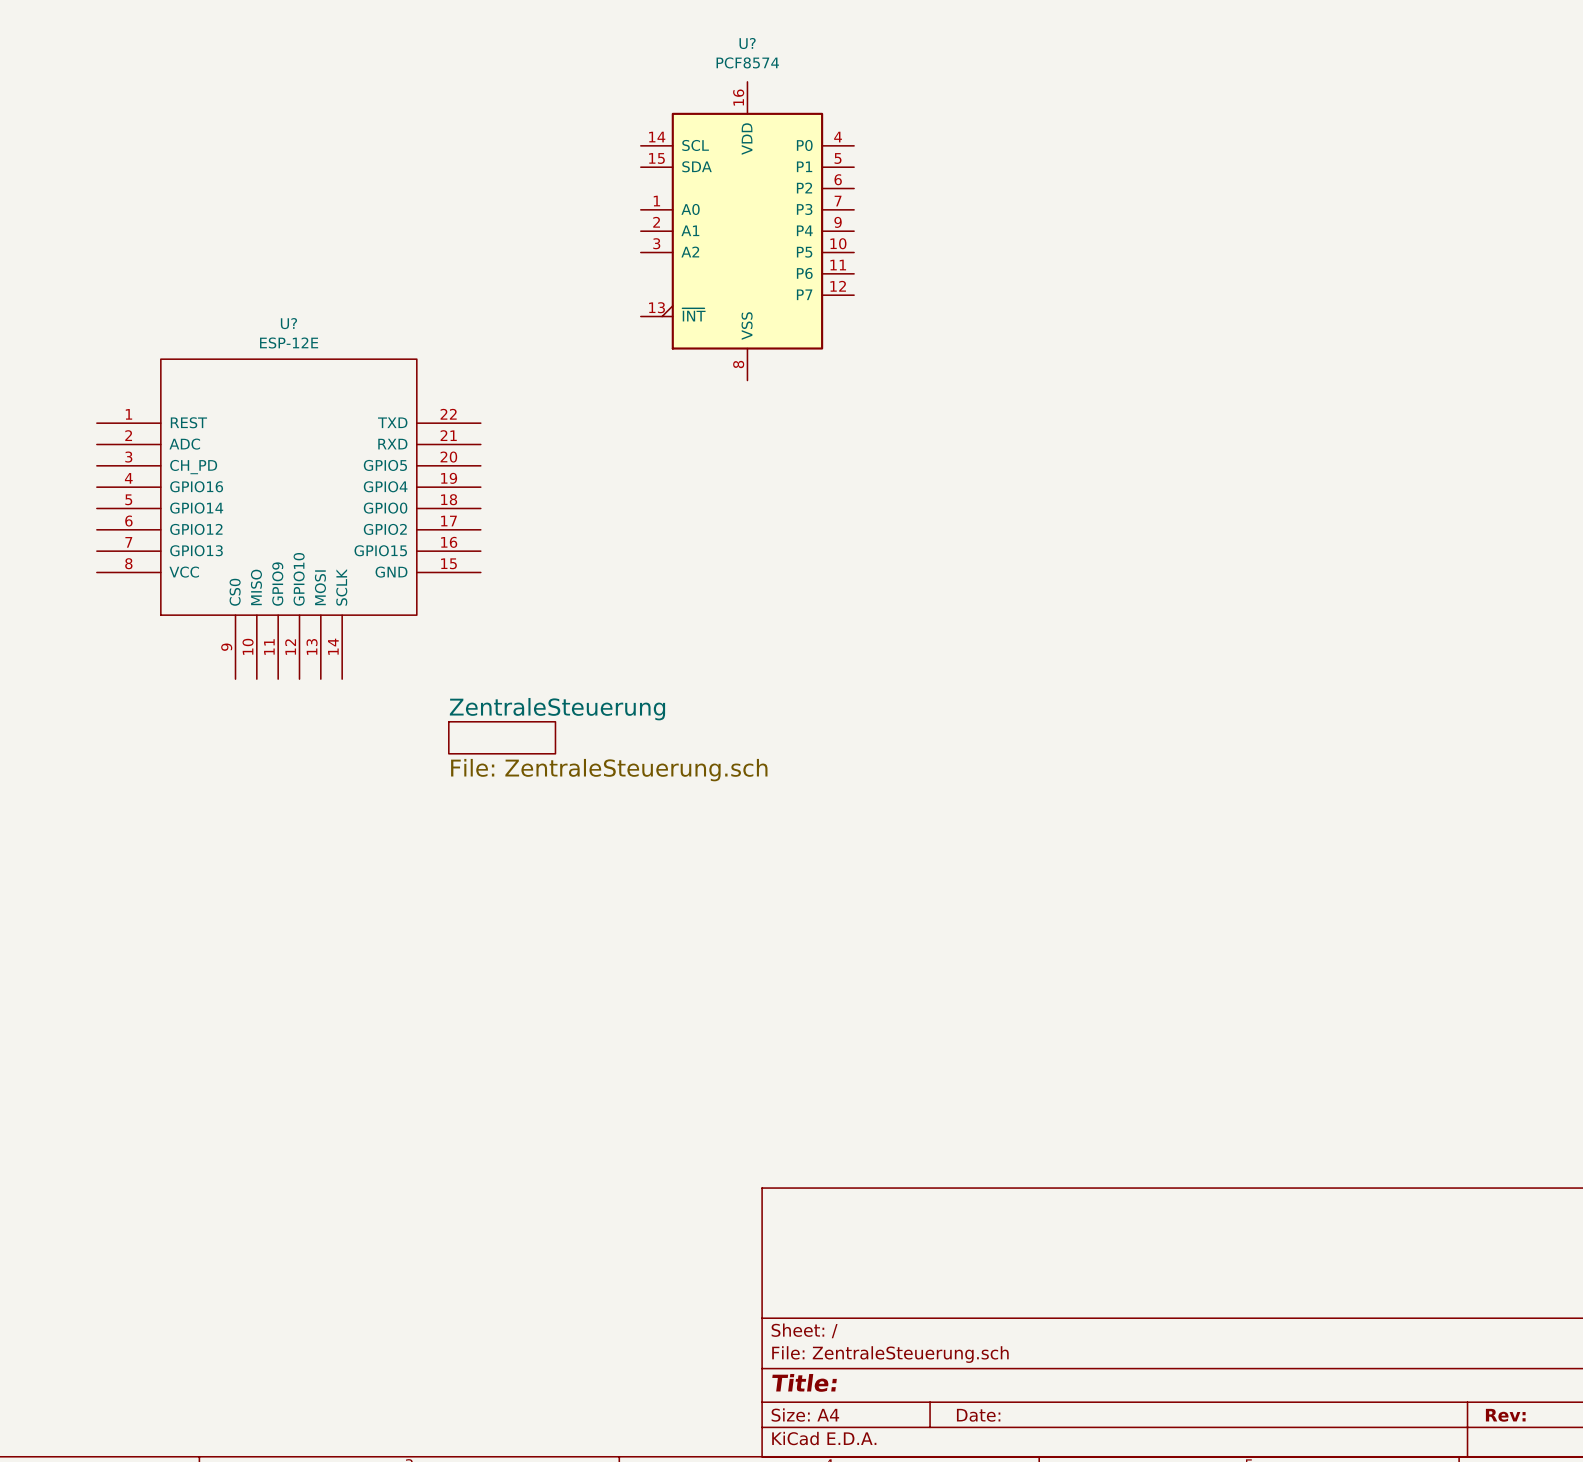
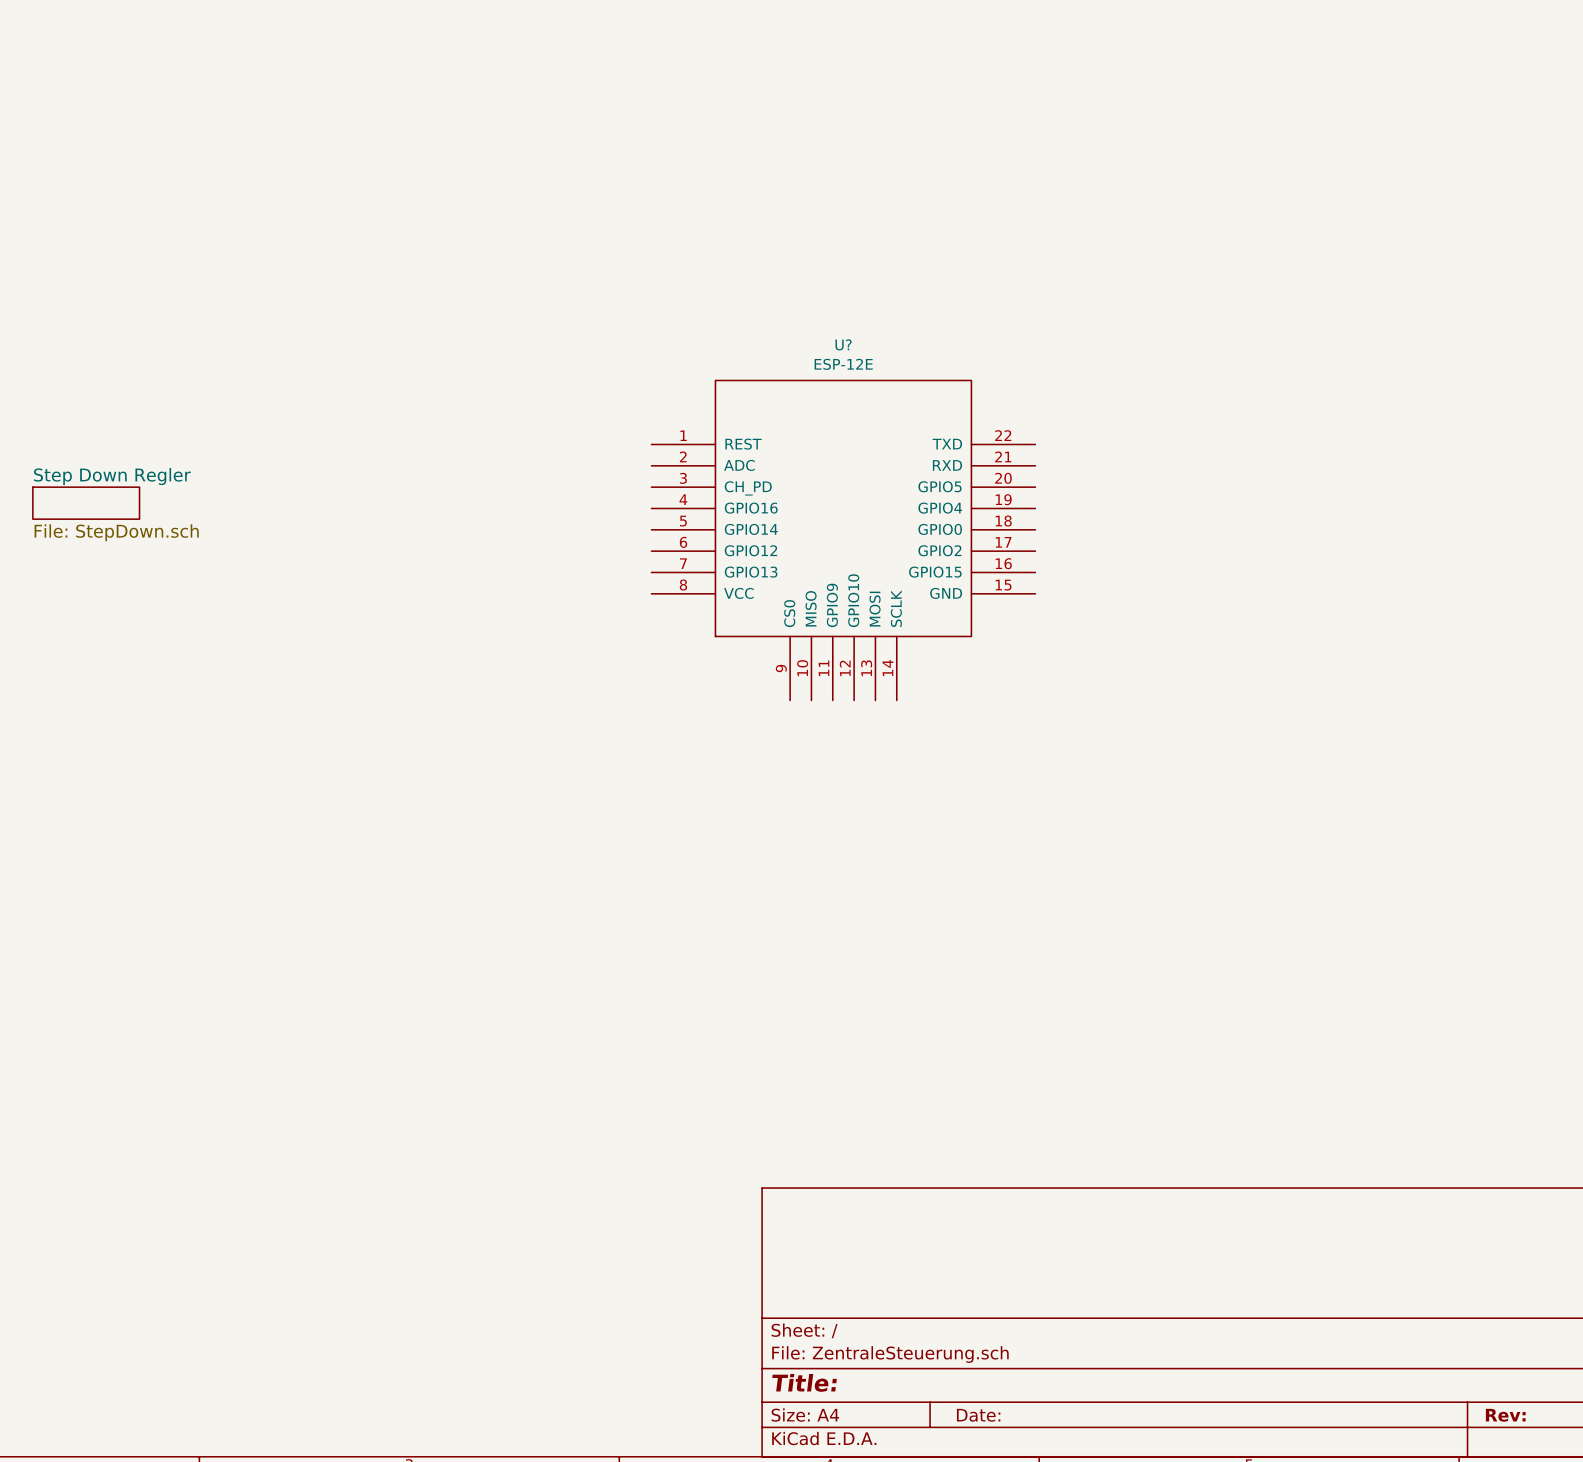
U?: PCF8574 (747, 231) -> none
sheet Step Down Regler: none -> File: StepDown.sch (86, 503)
U?: ESP-12E (288, 519) -> none
U?: none -> ESP-12E (843, 540)
sheet ZentraleSteuerung: File: ZentraleSteuerung.sch (502, 737) -> none

